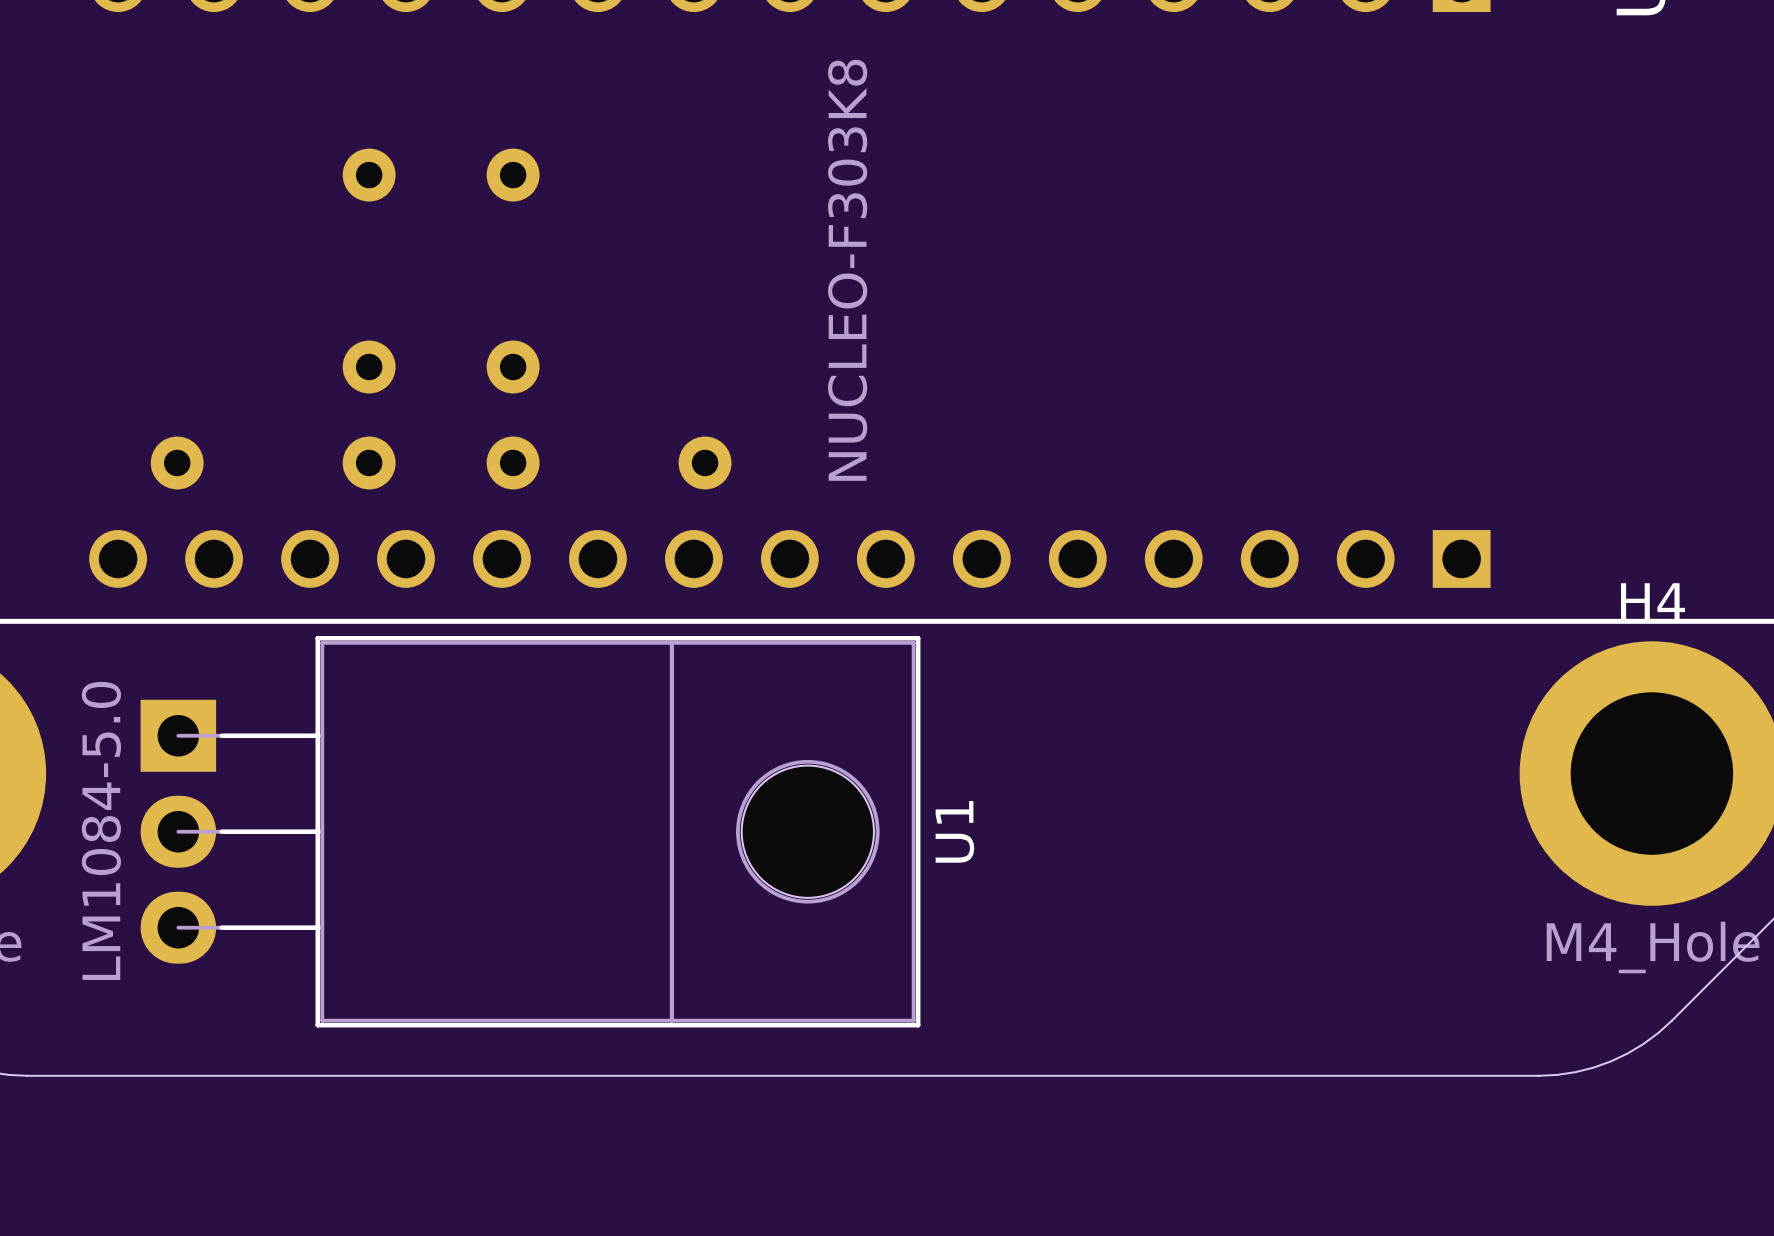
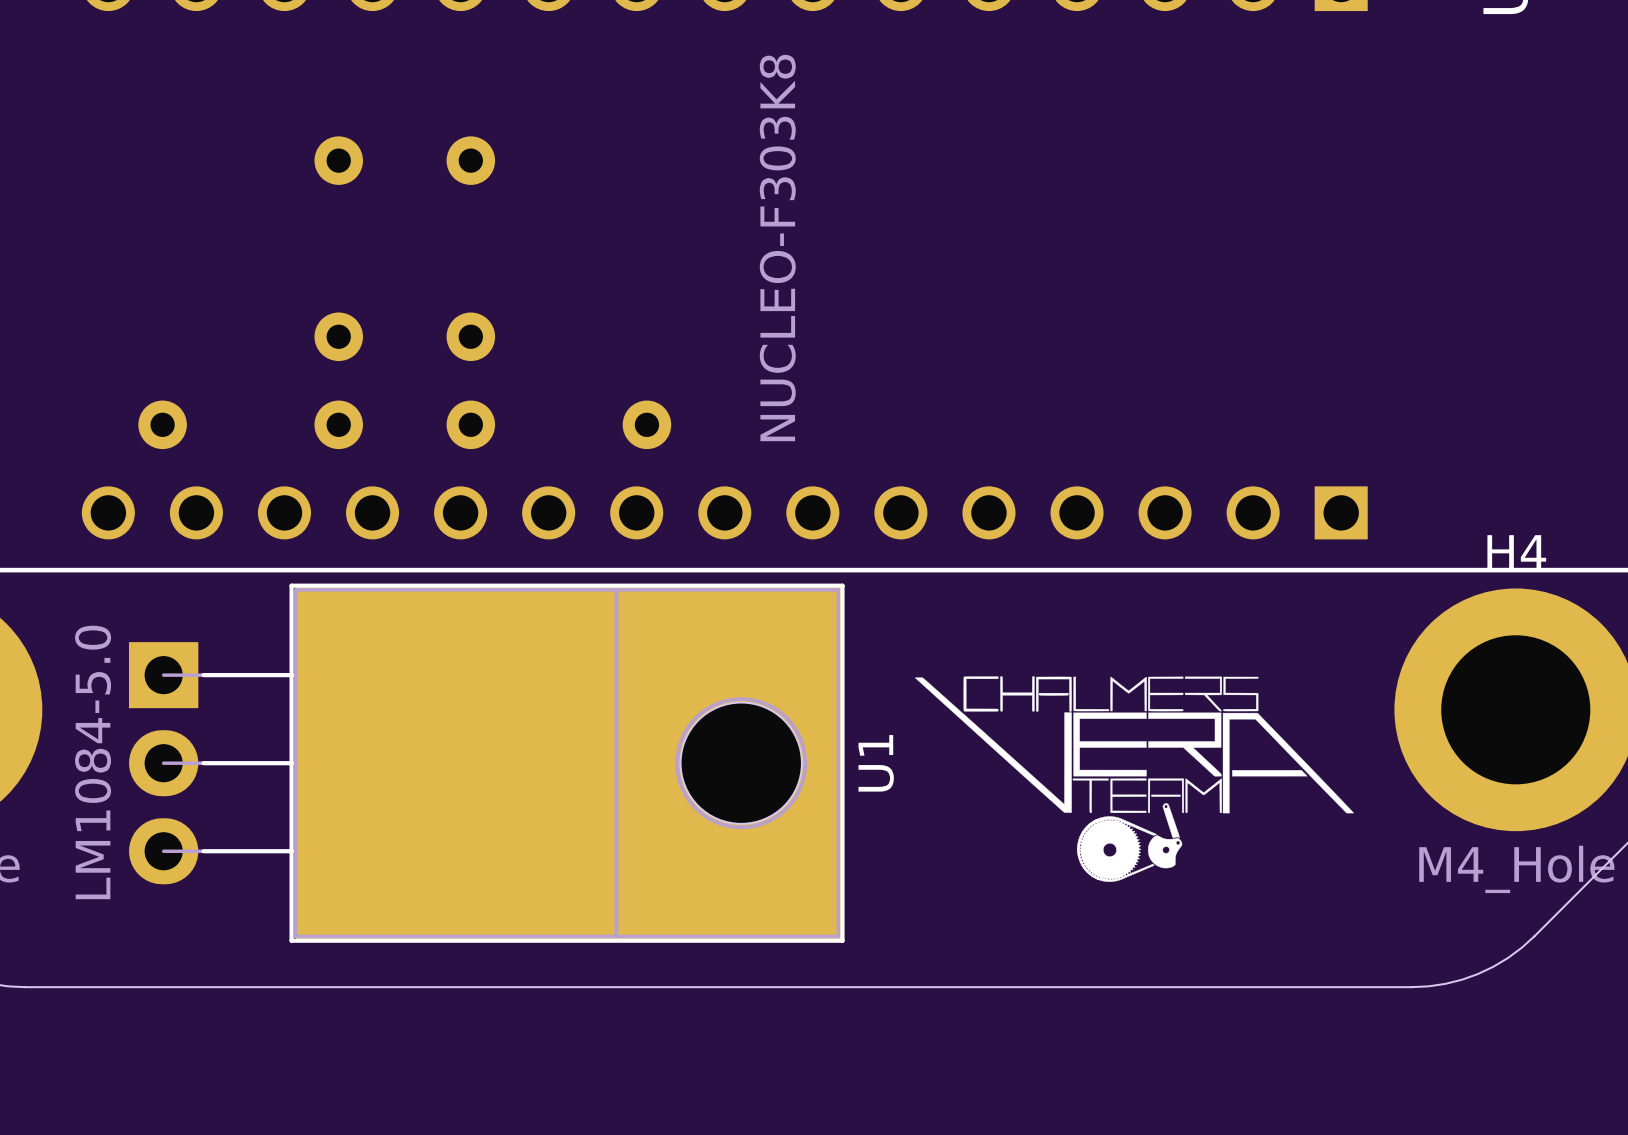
U1 footprint: [140, 636, 921, 1028] -> [128, 583, 845, 943]
drawing: none -> [914, 676, 1354, 882]

